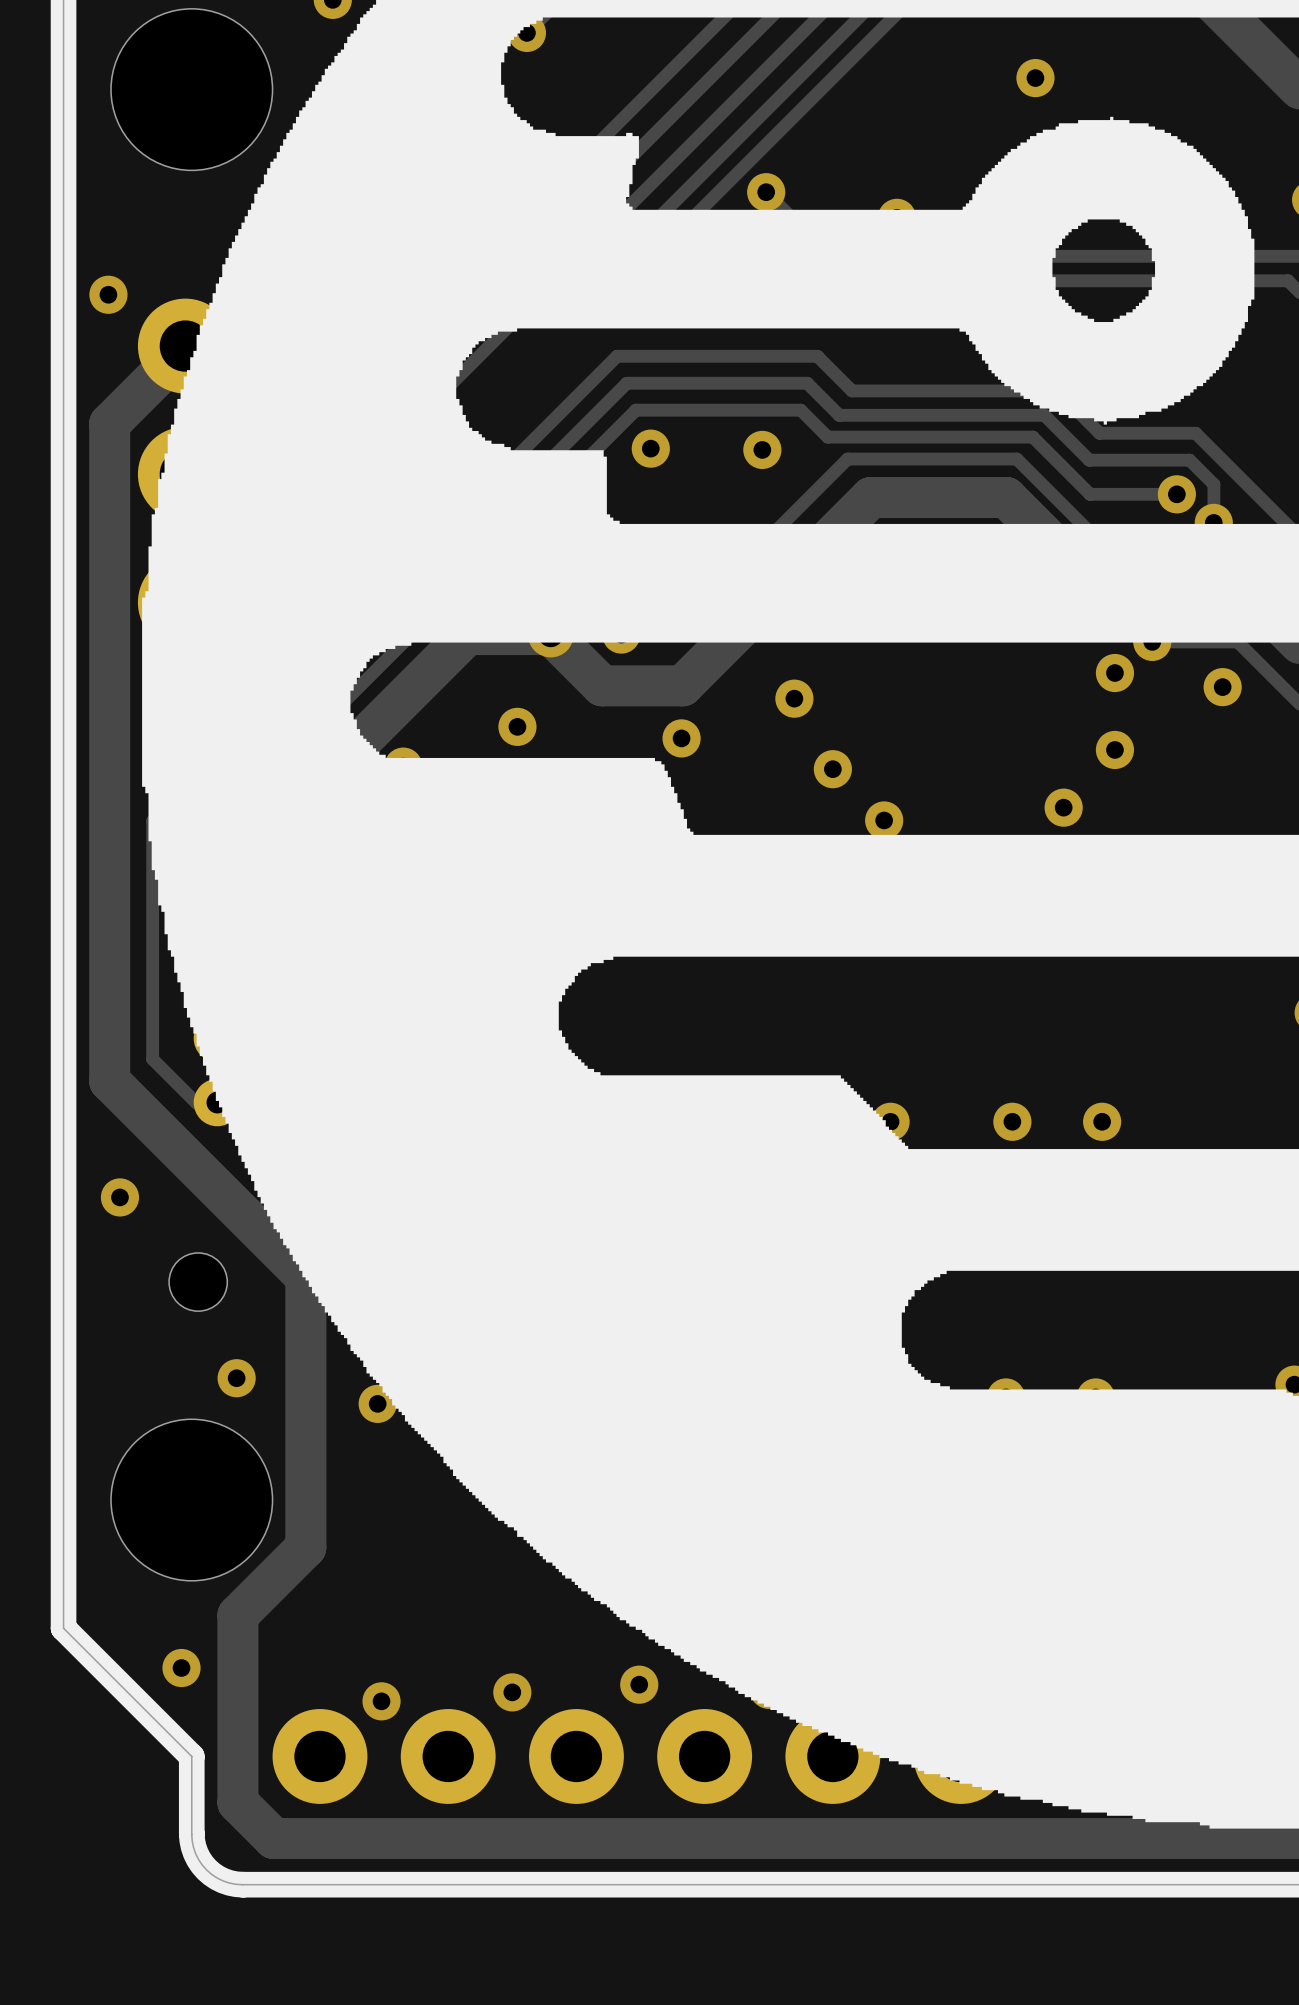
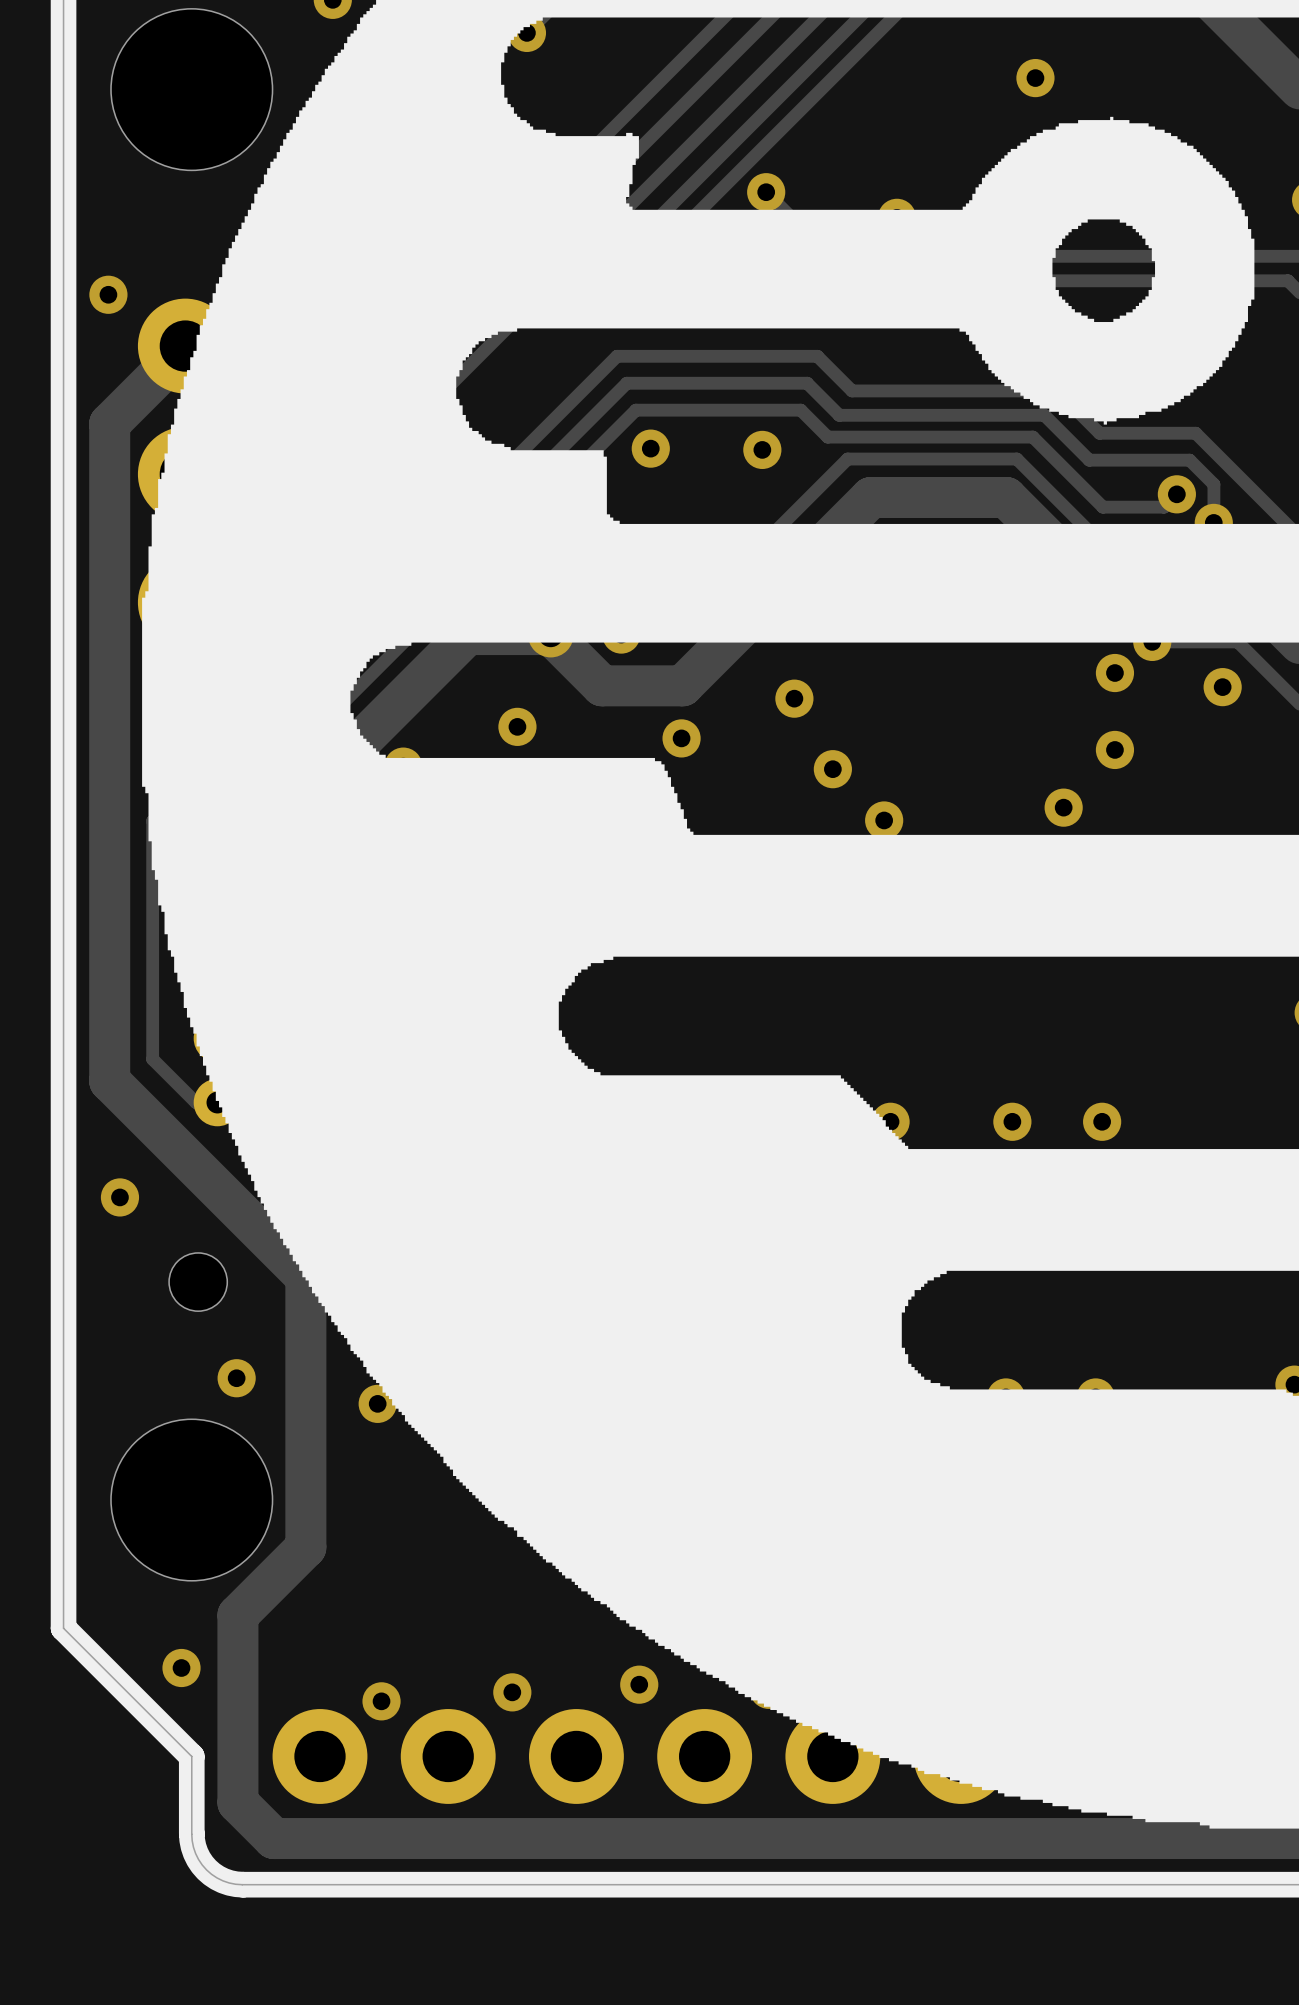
track: (1176, 494) (1090, 494) -> (1176, 494) (1164, 507) (1102, 507) (1090, 494)

